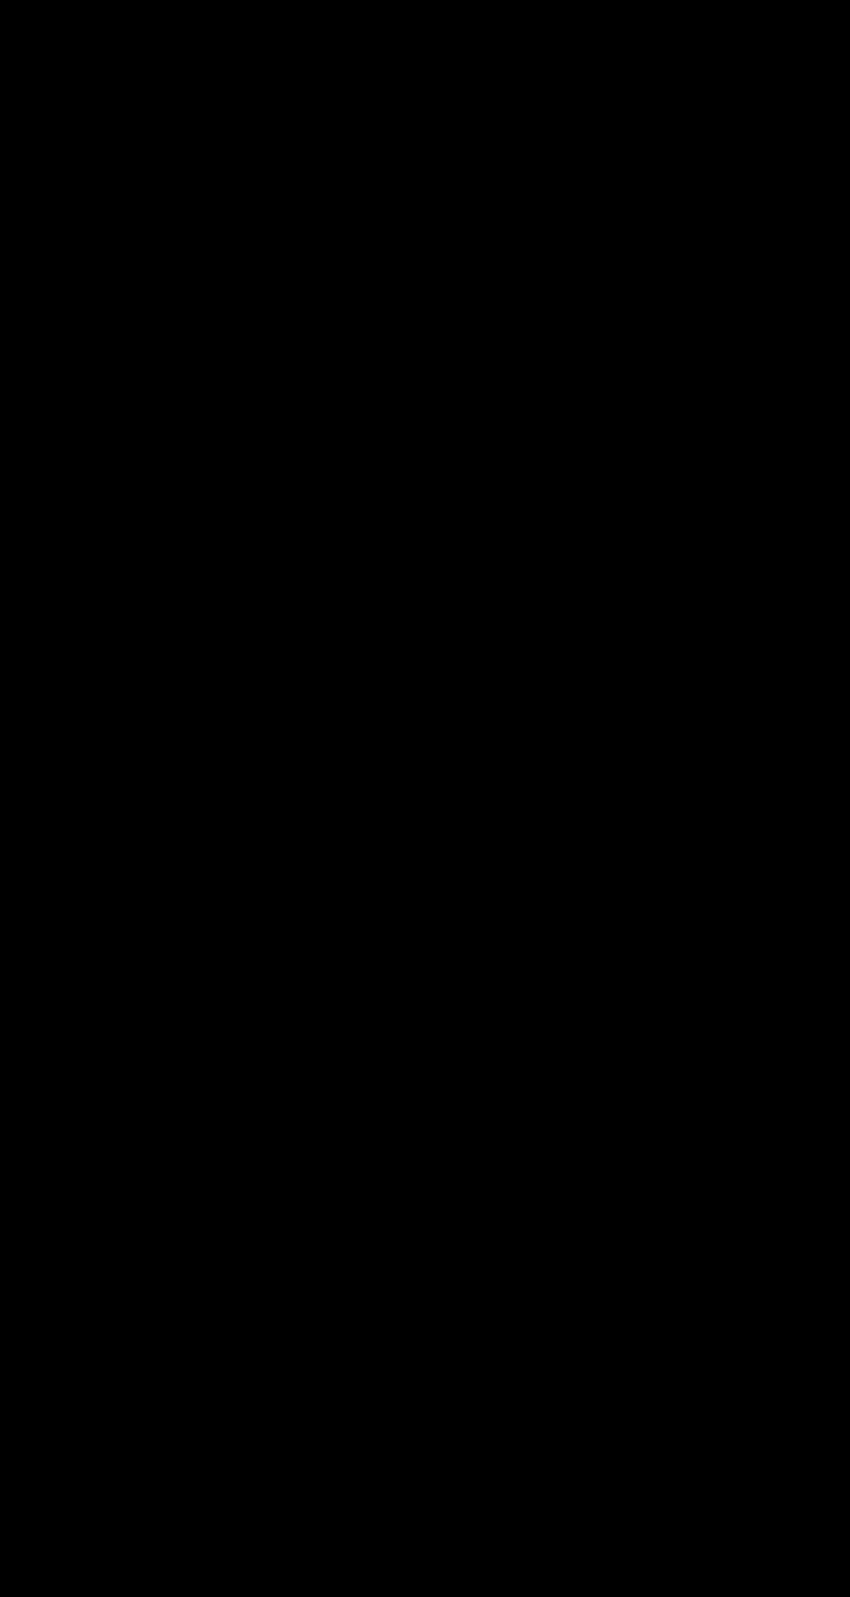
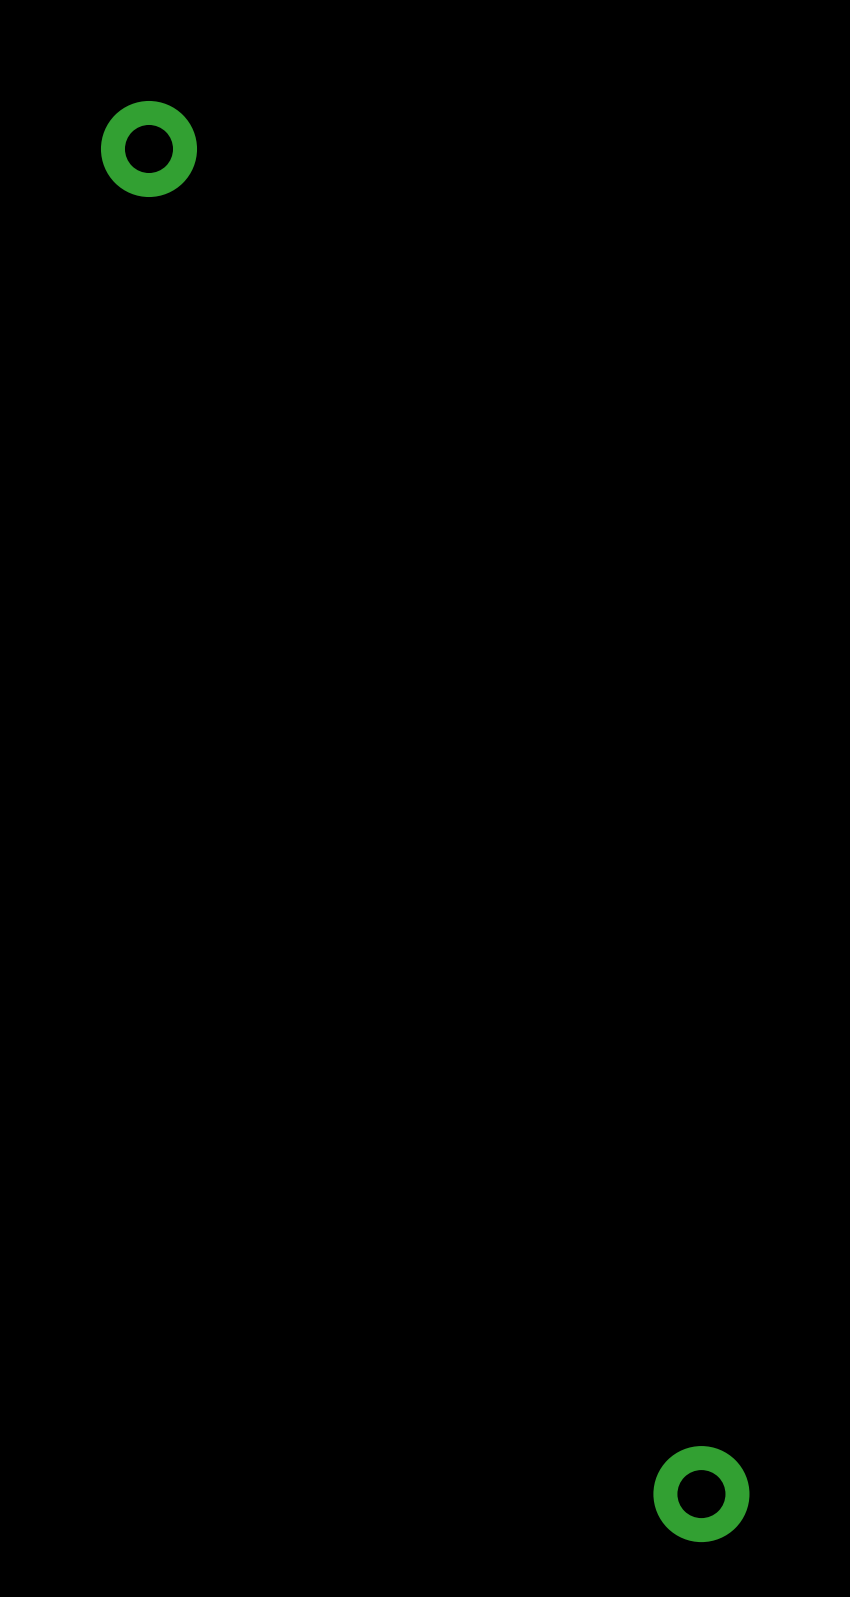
part: none -> (148, 148)
part: none -> (701, 1494)

